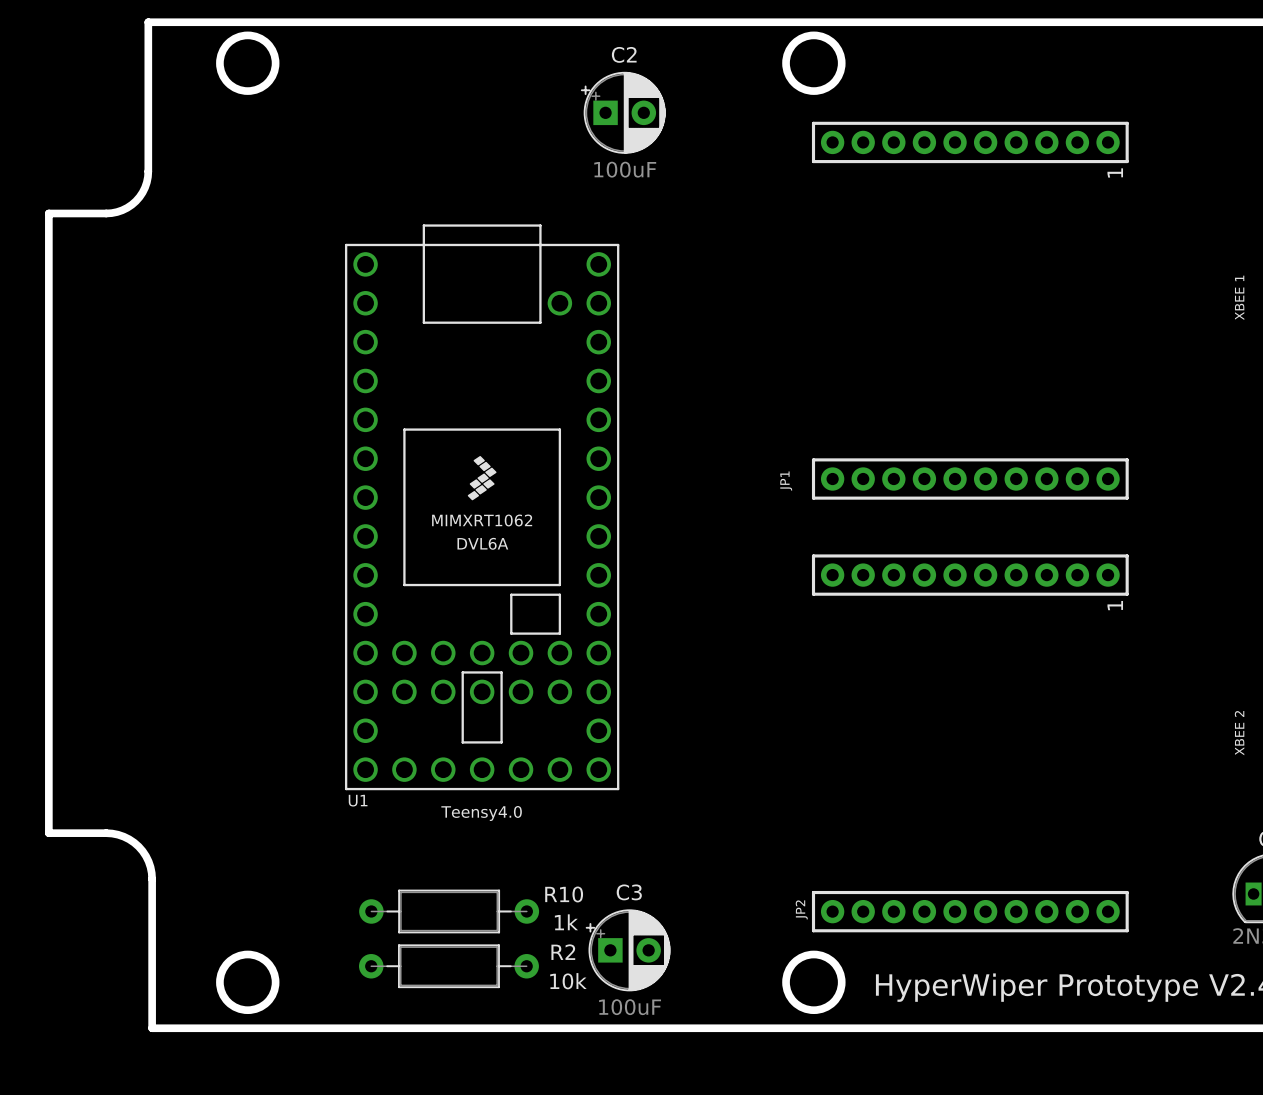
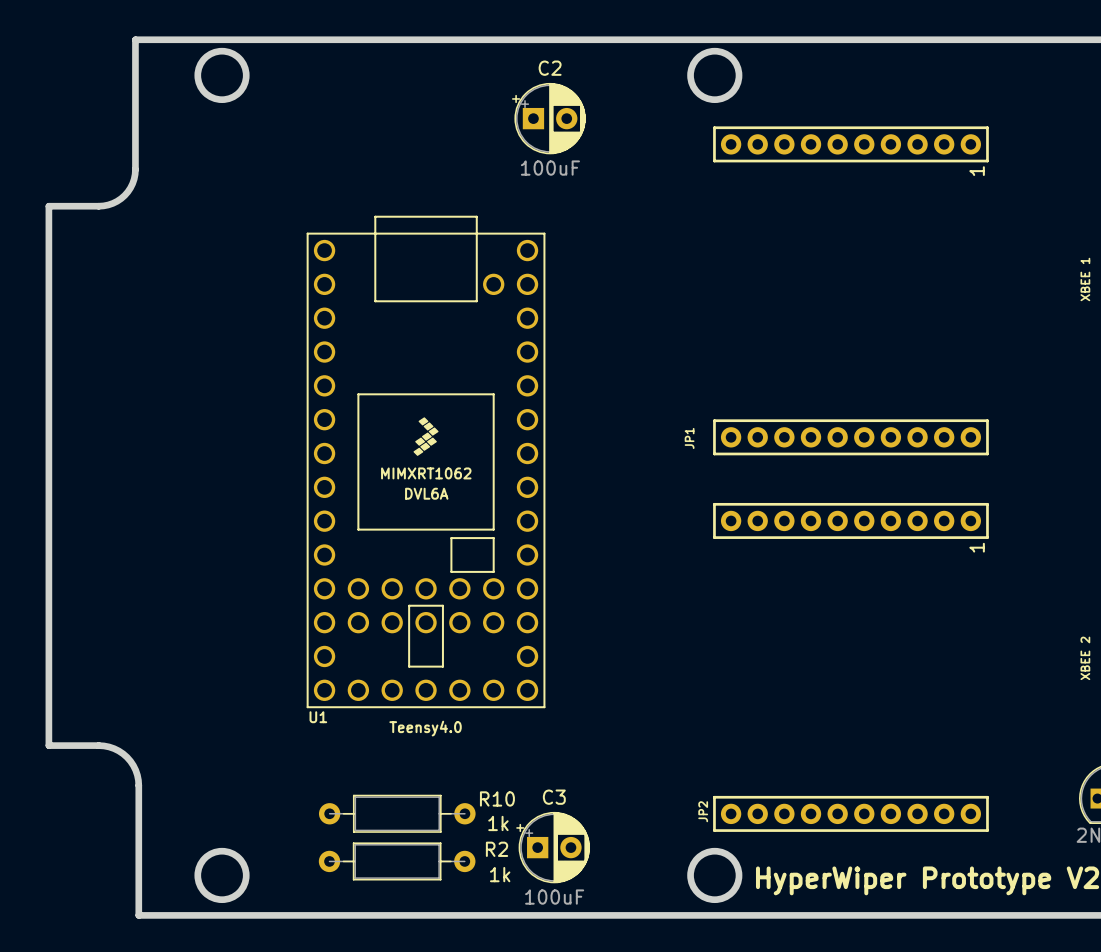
R2 value: 10k (568, 981) -> 1k (500, 874)

